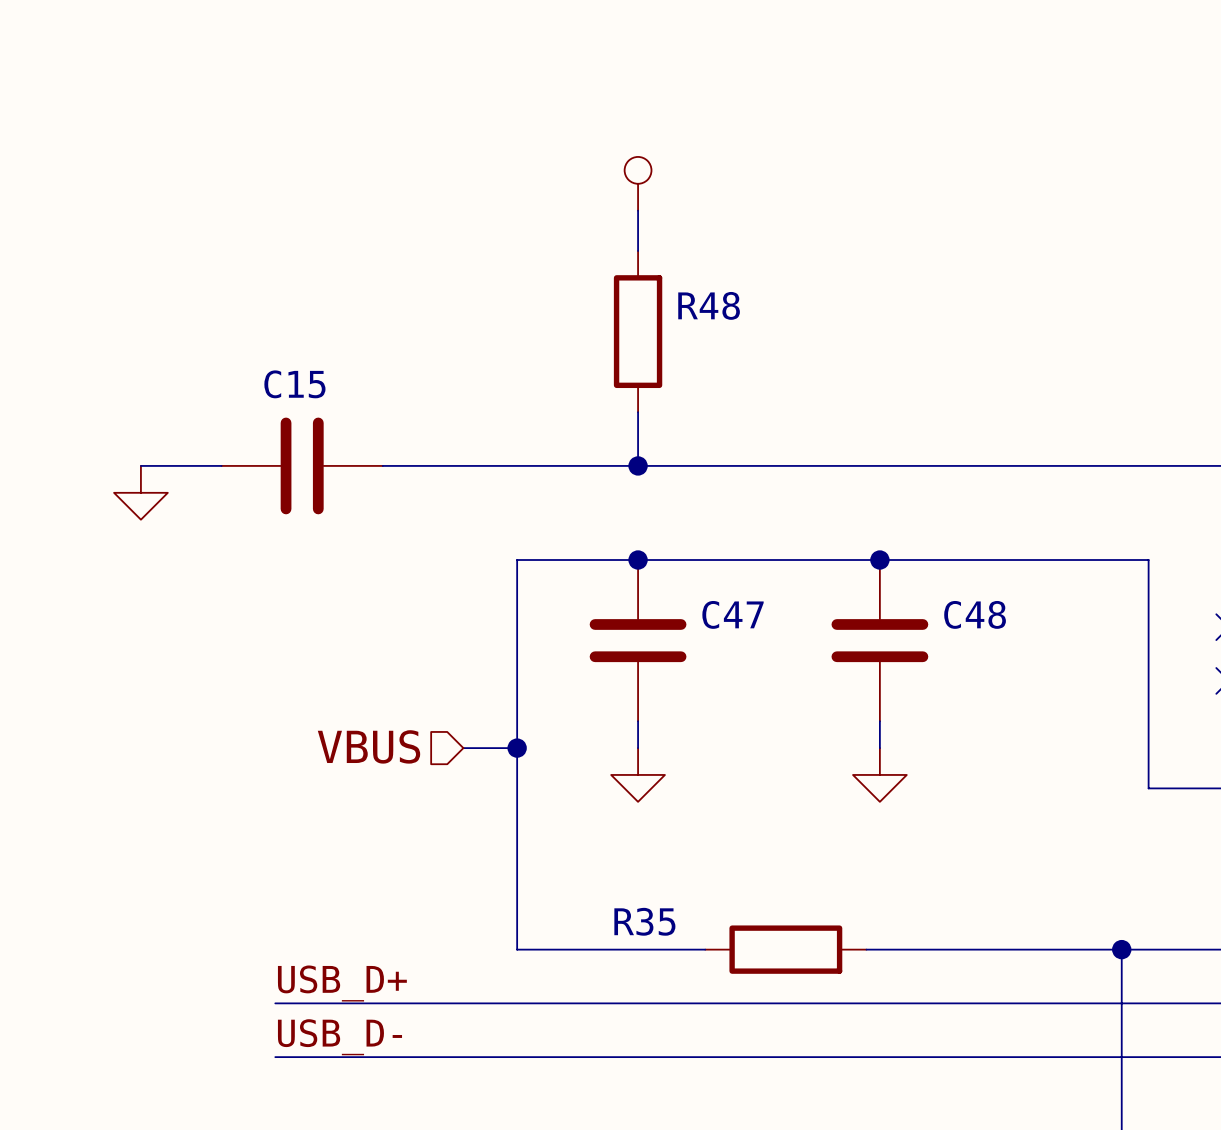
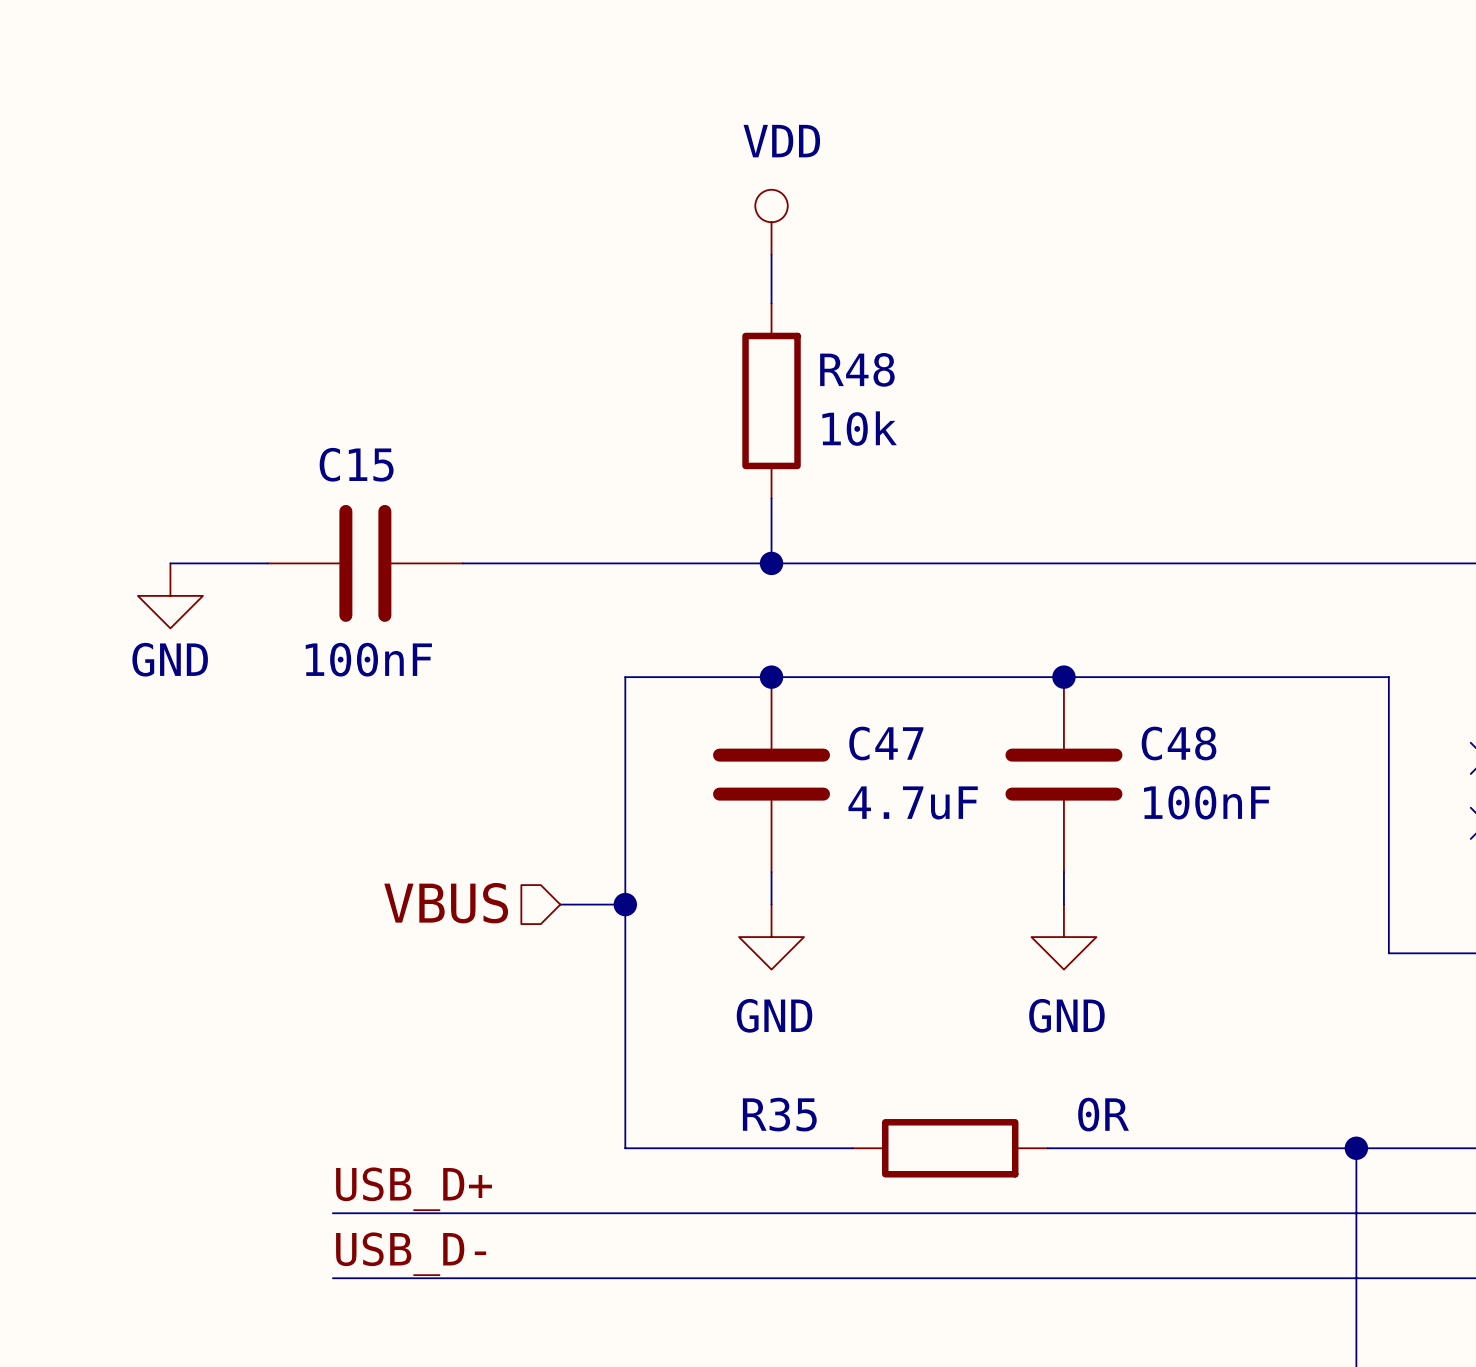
power symbol text: none -> VDD (781, 141)
R48 value: none -> 10k (859, 428)
power symbol text: none -> GND (170, 659)
C15 value: none -> 100nF (368, 659)
C48 value: none -> 100nF (1207, 802)
C47 value: none -> 4.7uF (913, 802)
power symbol text: none -> GND (774, 1015)
power symbol text: none -> GND (1066, 1015)
R35 value: none -> 0R (1103, 1114)

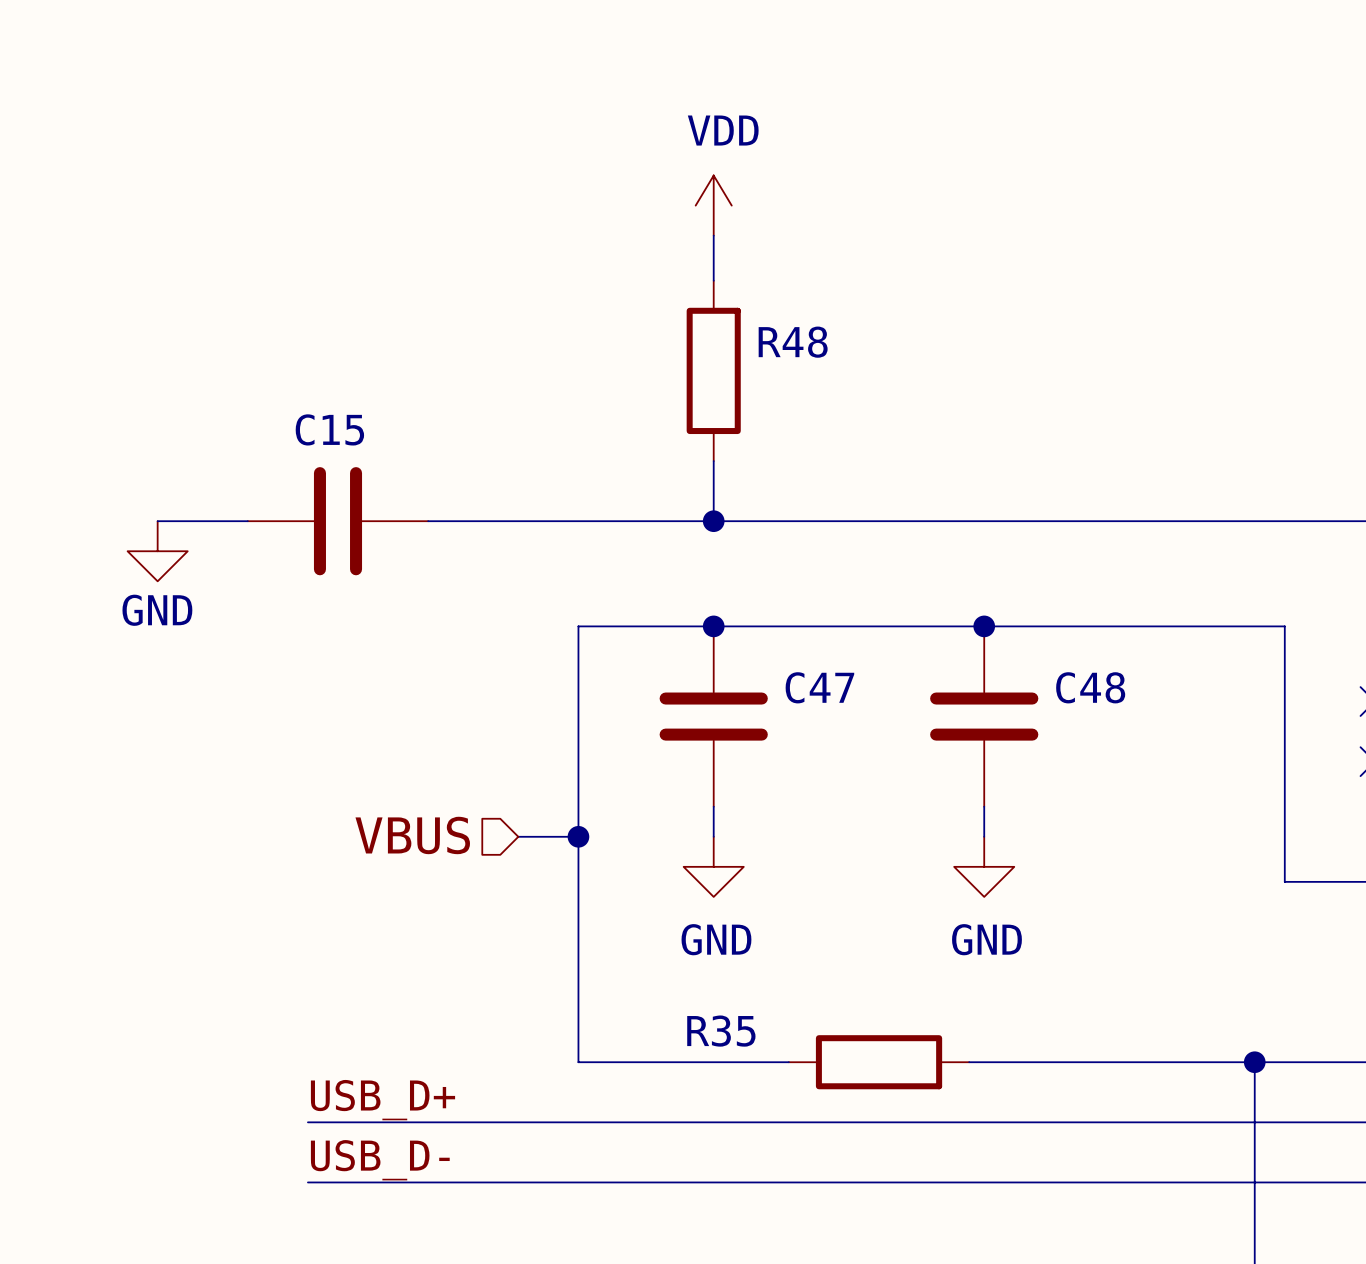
power symbol shape: [755, 189, 788, 255] -> [695, 175, 732, 236]
R48 value: 10k (859, 428) -> none
C15 value: 100nF (368, 659) -> none
C47 value: 4.7uF (913, 802) -> none
C48 value: 100nF (1207, 802) -> none
R35 value: 0R (1103, 1114) -> none

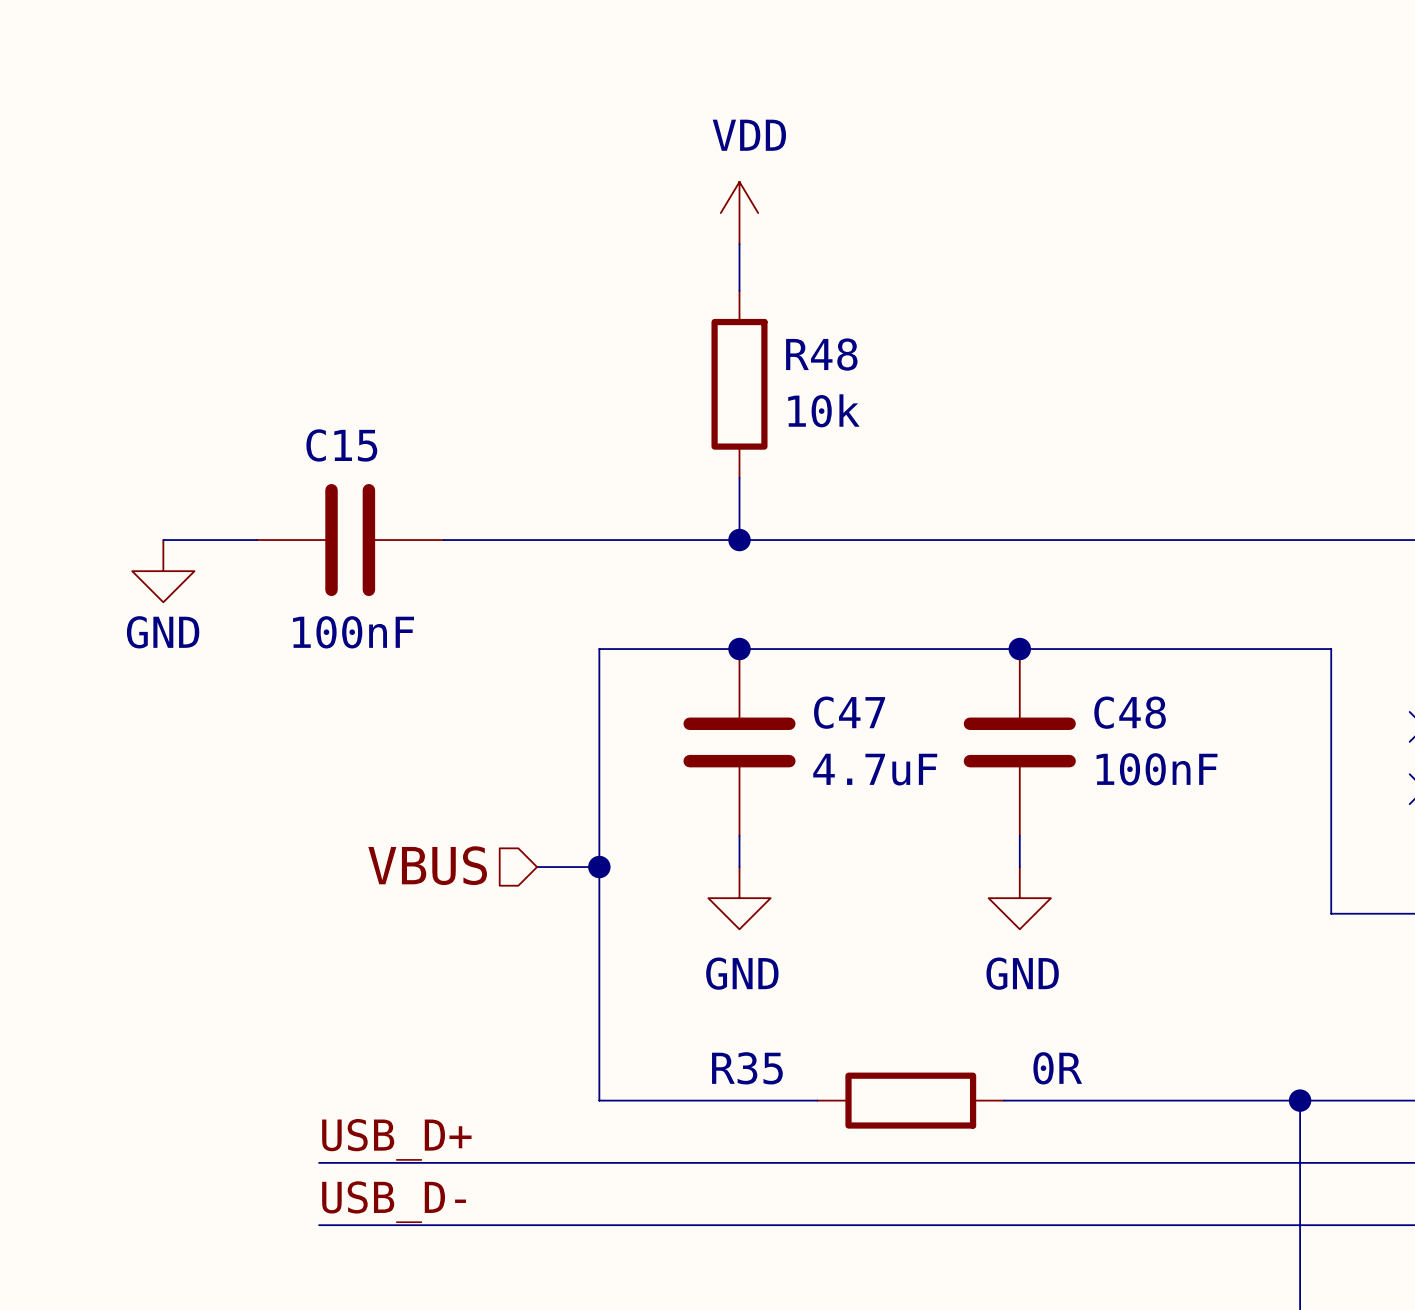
R48 value: none -> 10k (823, 410)
C15 value: none -> 100nF (353, 632)
C47 value: none -> 4.7uF (875, 769)
C48 value: none -> 100nF (1157, 769)
R35 value: none -> 0R (1057, 1068)

